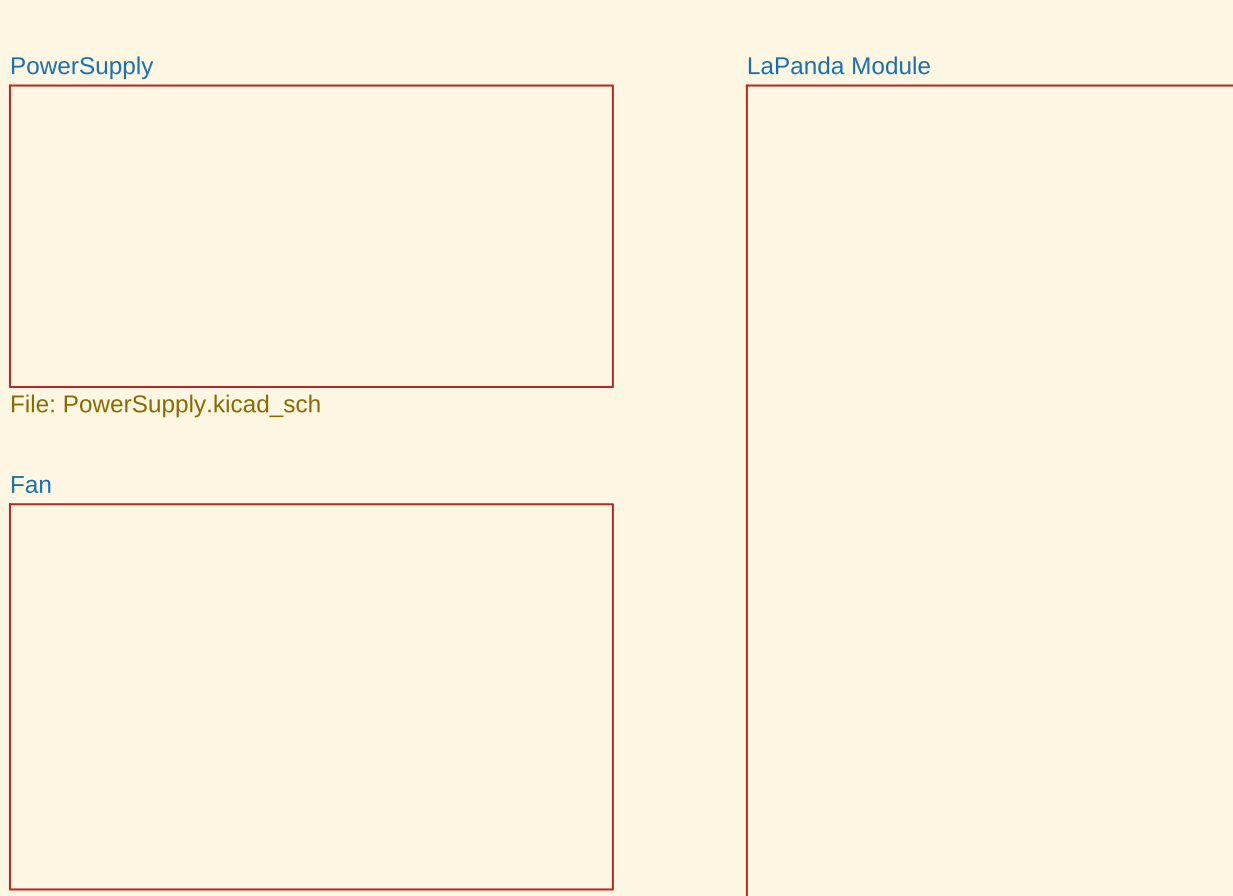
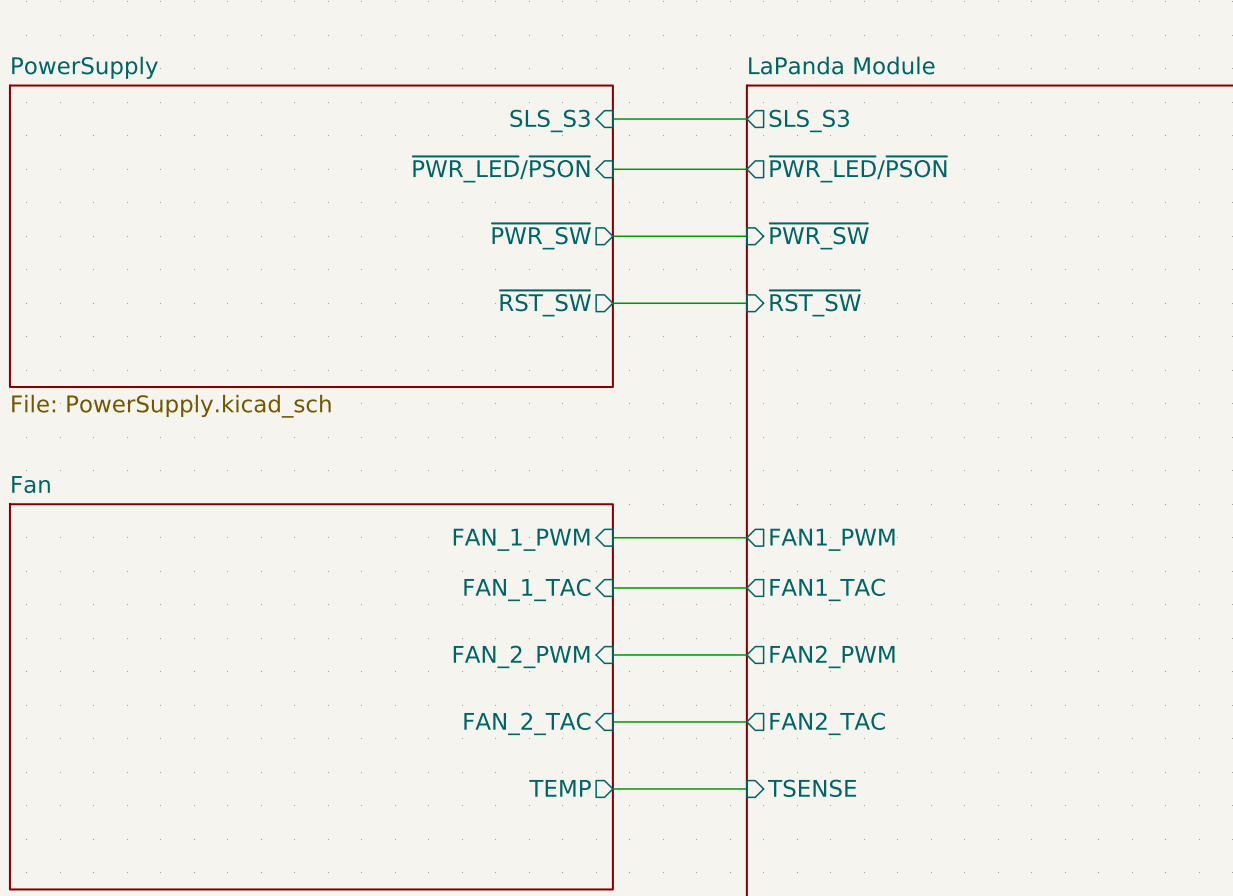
wire: none -> (612, 119) (746, 119)
sheet pin: none -> SLS_S3 (550, 120)
sheet pin: none -> SLS_S3 (809, 120)
sheet pin: none -> ~{PWR_LED}/~{PSON} (501, 169)
wire: none -> (612, 169) (746, 169)
sheet pin: none -> ~{PWR_LED}/~{PSON} (858, 169)
sheet pin: none -> ~{PWR_SW} (541, 236)
wire: none -> (612, 236) (746, 236)
sheet pin: none -> ~{PWR_SW} (819, 236)
sheet pin: none -> ~{RST_SW} (545, 303)
wire: none -> (612, 303) (746, 303)
sheet pin: none -> ~{RST_SW} (815, 303)
wire: none -> (612, 537) (746, 537)
sheet pin: none -> FAN_1_PWM (521, 539)
sheet pin: none -> FAN1_PWM (832, 539)
wire: none -> (612, 587) (746, 587)
sheet pin: none -> FAN_1_TAC (527, 589)
sheet pin: none -> FAN1_TAC (827, 589)
wire: none -> (612, 654) (746, 654)
sheet pin: none -> FAN_2_PWM (521, 656)
sheet pin: none -> FAN2_PWM (832, 656)
wire: none -> (612, 721) (746, 721)
sheet pin: none -> FAN_2_TAC (527, 723)
sheet pin: none -> FAN2_TAC (827, 723)
sheet pin: none -> TEMP (560, 788)
wire: none -> (612, 788) (746, 788)
sheet pin: none -> TSENSE (812, 788)

